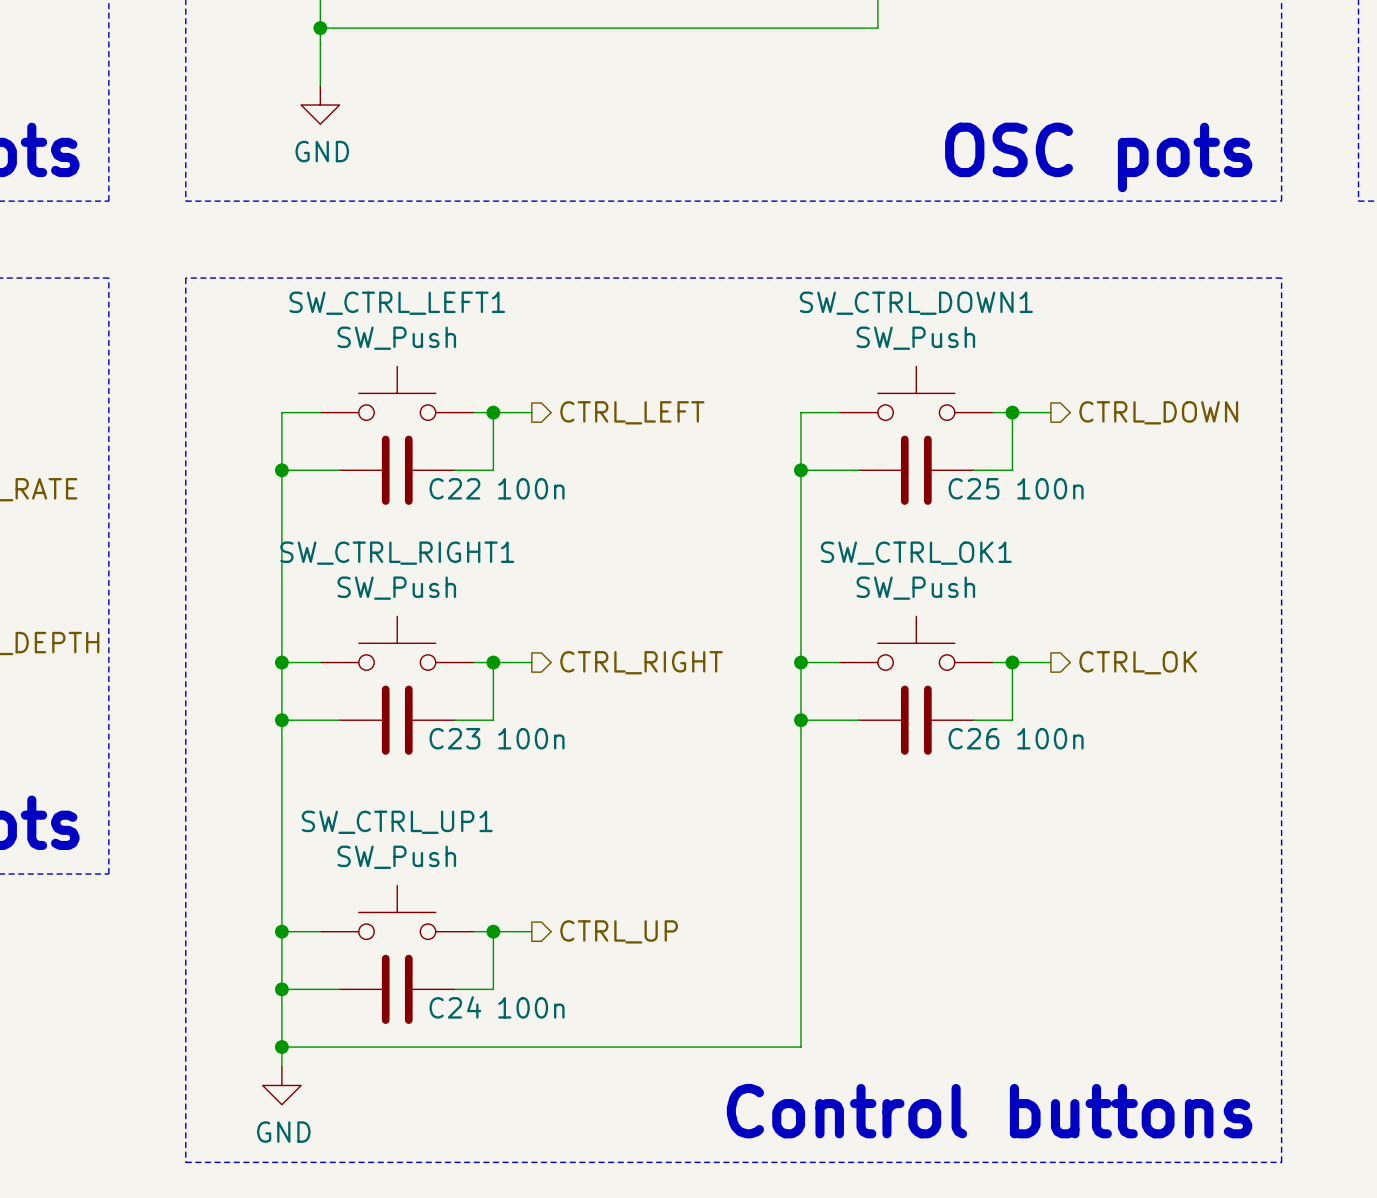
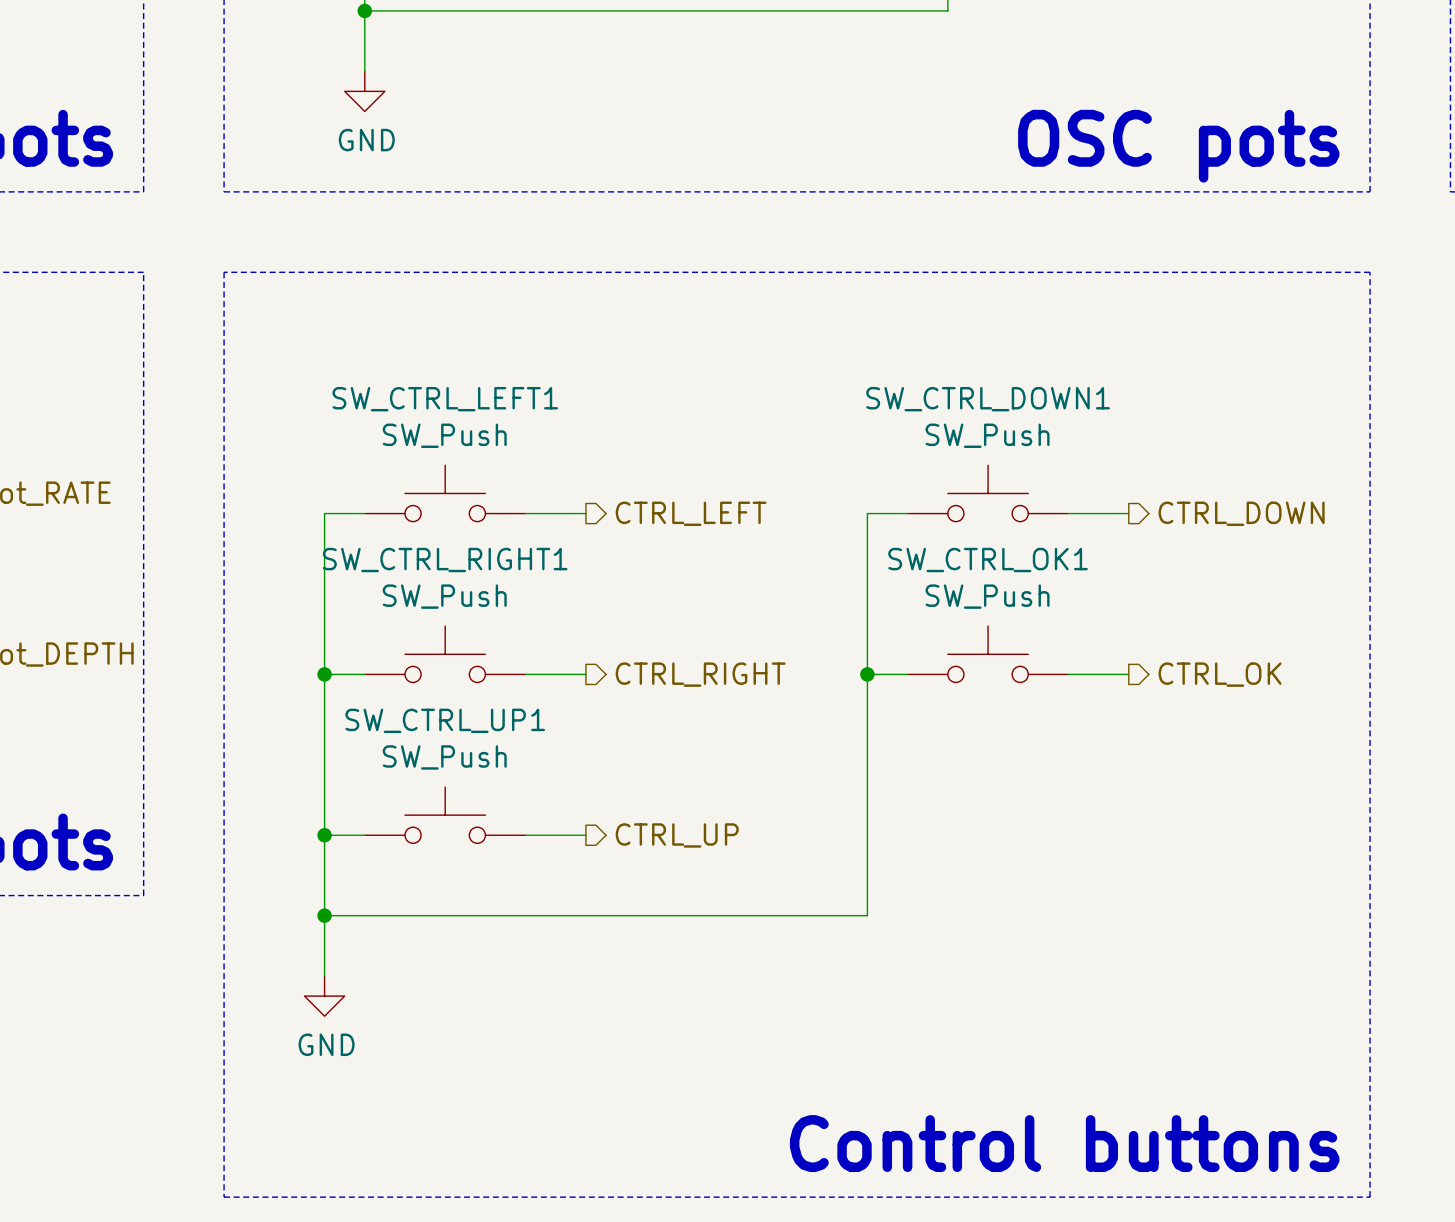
SW_CTRL_LEFT1 position: (397, 393) -> (445, 493)
SW_CTRL_DOWN1 position: (916, 393) -> (988, 493)
wire: (320, 412) (281, 412) (281, 508) -> (364, 513) (324, 513)
wire: (474, 412) (531, 412) -> (525, 513) (585, 513)
wire: (493, 412) (493, 470) (454, 470) -> none
junction: (493, 412) -> none
hierarchical label position: CTRL_LEFT (632, 412) -> CTRL_LEFT (691, 513)
wire: (839, 412) (800, 412) (800, 508) -> (907, 513) (867, 513)
wire: (993, 412) (1050, 412) -> (1068, 513) (1128, 513)
wire: (1012, 412) (1012, 470) (974, 470) -> none
junction: (1012, 412) -> none
hierarchical label position: CTRL_DOWN (1158, 412) -> CTRL_DOWN (1241, 513)
wire: (281, 470) (339, 470) -> none
junction: (281, 470) -> none
C22: 100n (397, 470) -> none
wire: (800, 470) (858, 470) -> none
junction: (800, 470) -> none
C25: 100n (916, 470) -> none
wire: (493, 662) (493, 720) (454, 720) -> none
junction: (493, 662) -> none
wire: (1012, 662) (1012, 720) (974, 720) -> none
junction: (1012, 662) -> none
wire: (281, 720) (339, 720) -> none
junction: (281, 720) -> none
C23: 100n (397, 720) -> none
wire: (800, 720) (858, 720) -> none
junction: (800, 720) -> none
C26: 100n (916, 720) -> none
junction: none -> (324, 835)
wire: (800, 893) (800, 1047) (281, 1047) -> (867, 915) (324, 915)
SW_CTRL_UP1 position: (397, 912) -> (445, 815)
wire: (281, 931) (320, 931) -> (324, 835) (364, 835)
junction position: (281, 931) -> (324, 915)
wire: (474, 931) (531, 931) -> (525, 835) (585, 835)
wire: (493, 931) (493, 989) (454, 989) -> none
junction: (493, 931) -> none
hierarchical label position: CTRL_UP (619, 931) -> CTRL_UP (677, 835)
wire: (281, 950) (281, 1066) -> none
wire: (281, 989) (339, 989) -> none
junction: (281, 989) -> none
C24: 100n (397, 989) -> none
junction: (281, 1047) -> none
power symbol position: GND (281, 1085) -> GND (324, 996)

